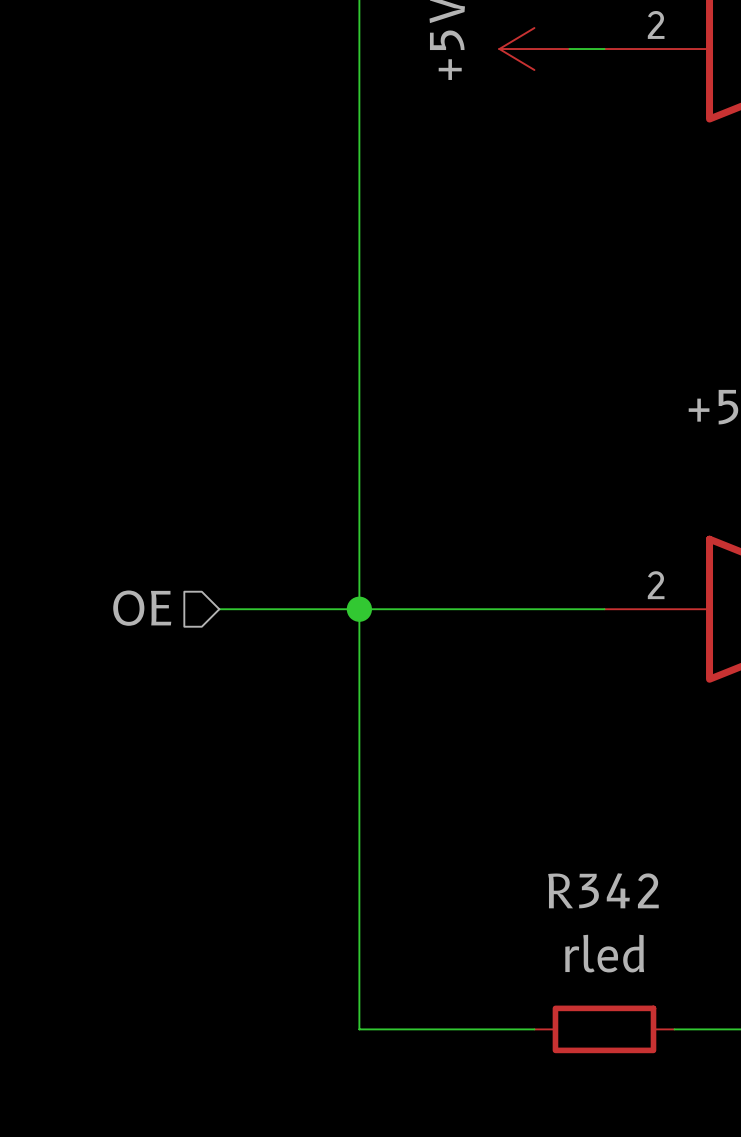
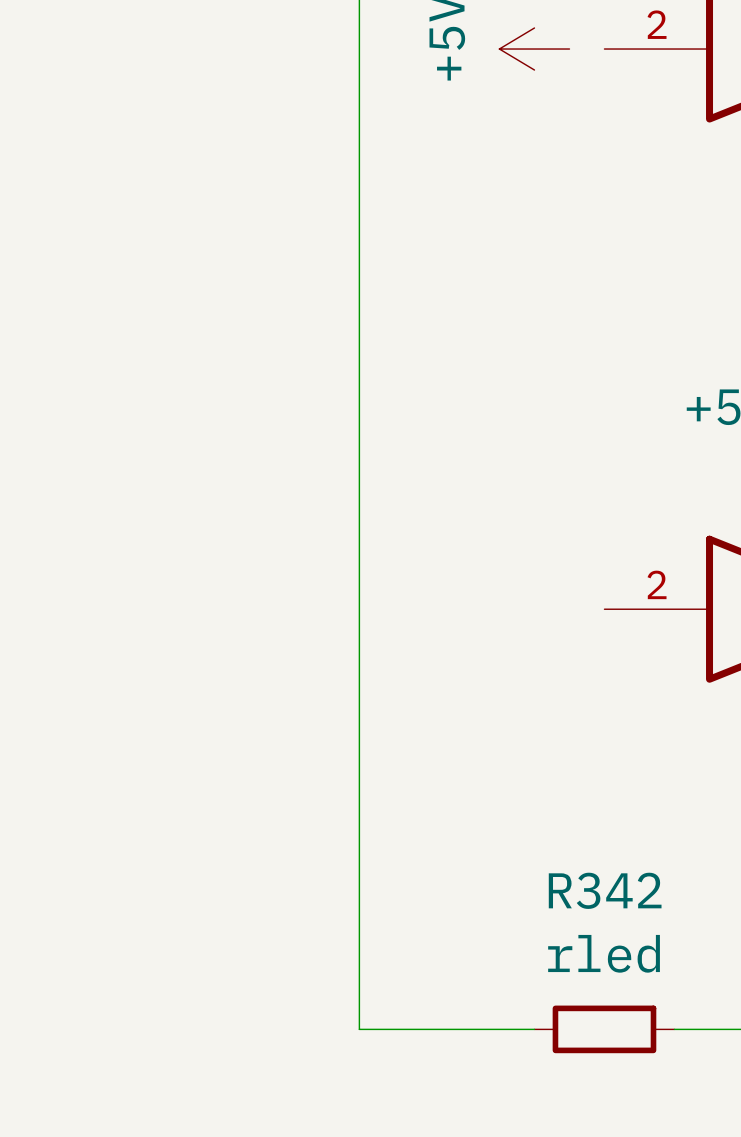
wire: (569, 49) (604, 49) -> none
hierarchical label: OE (142, 608) -> none
wire: (219, 609) (604, 609) -> none
junction: (359, 609) -> none

